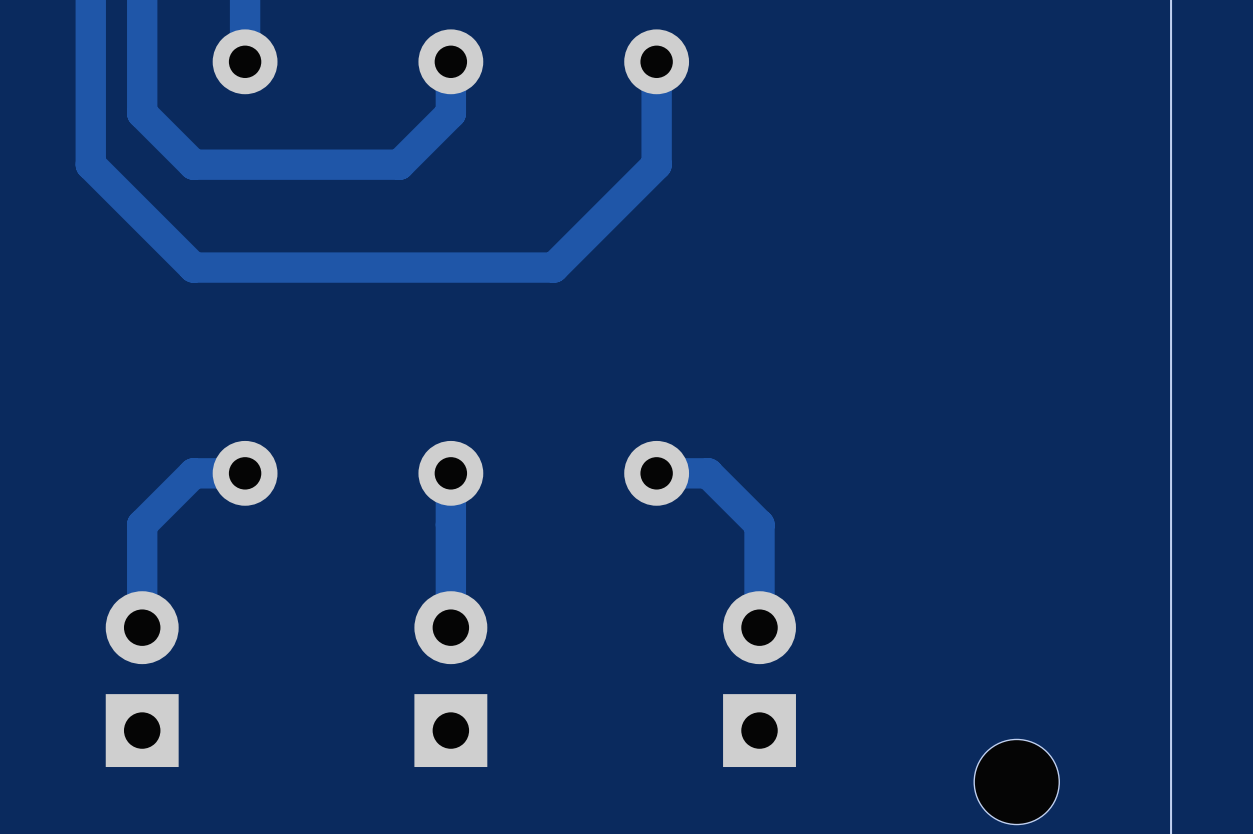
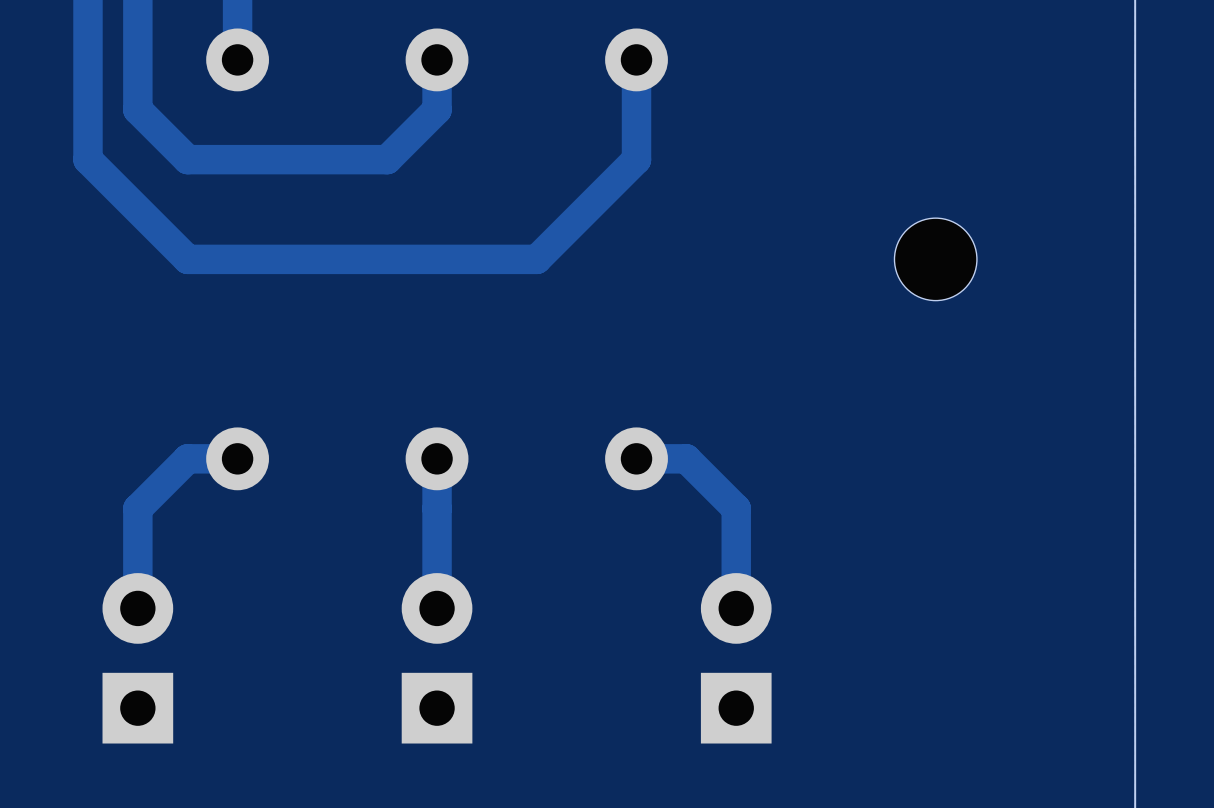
part position: (1016, 782) -> (935, 259)

